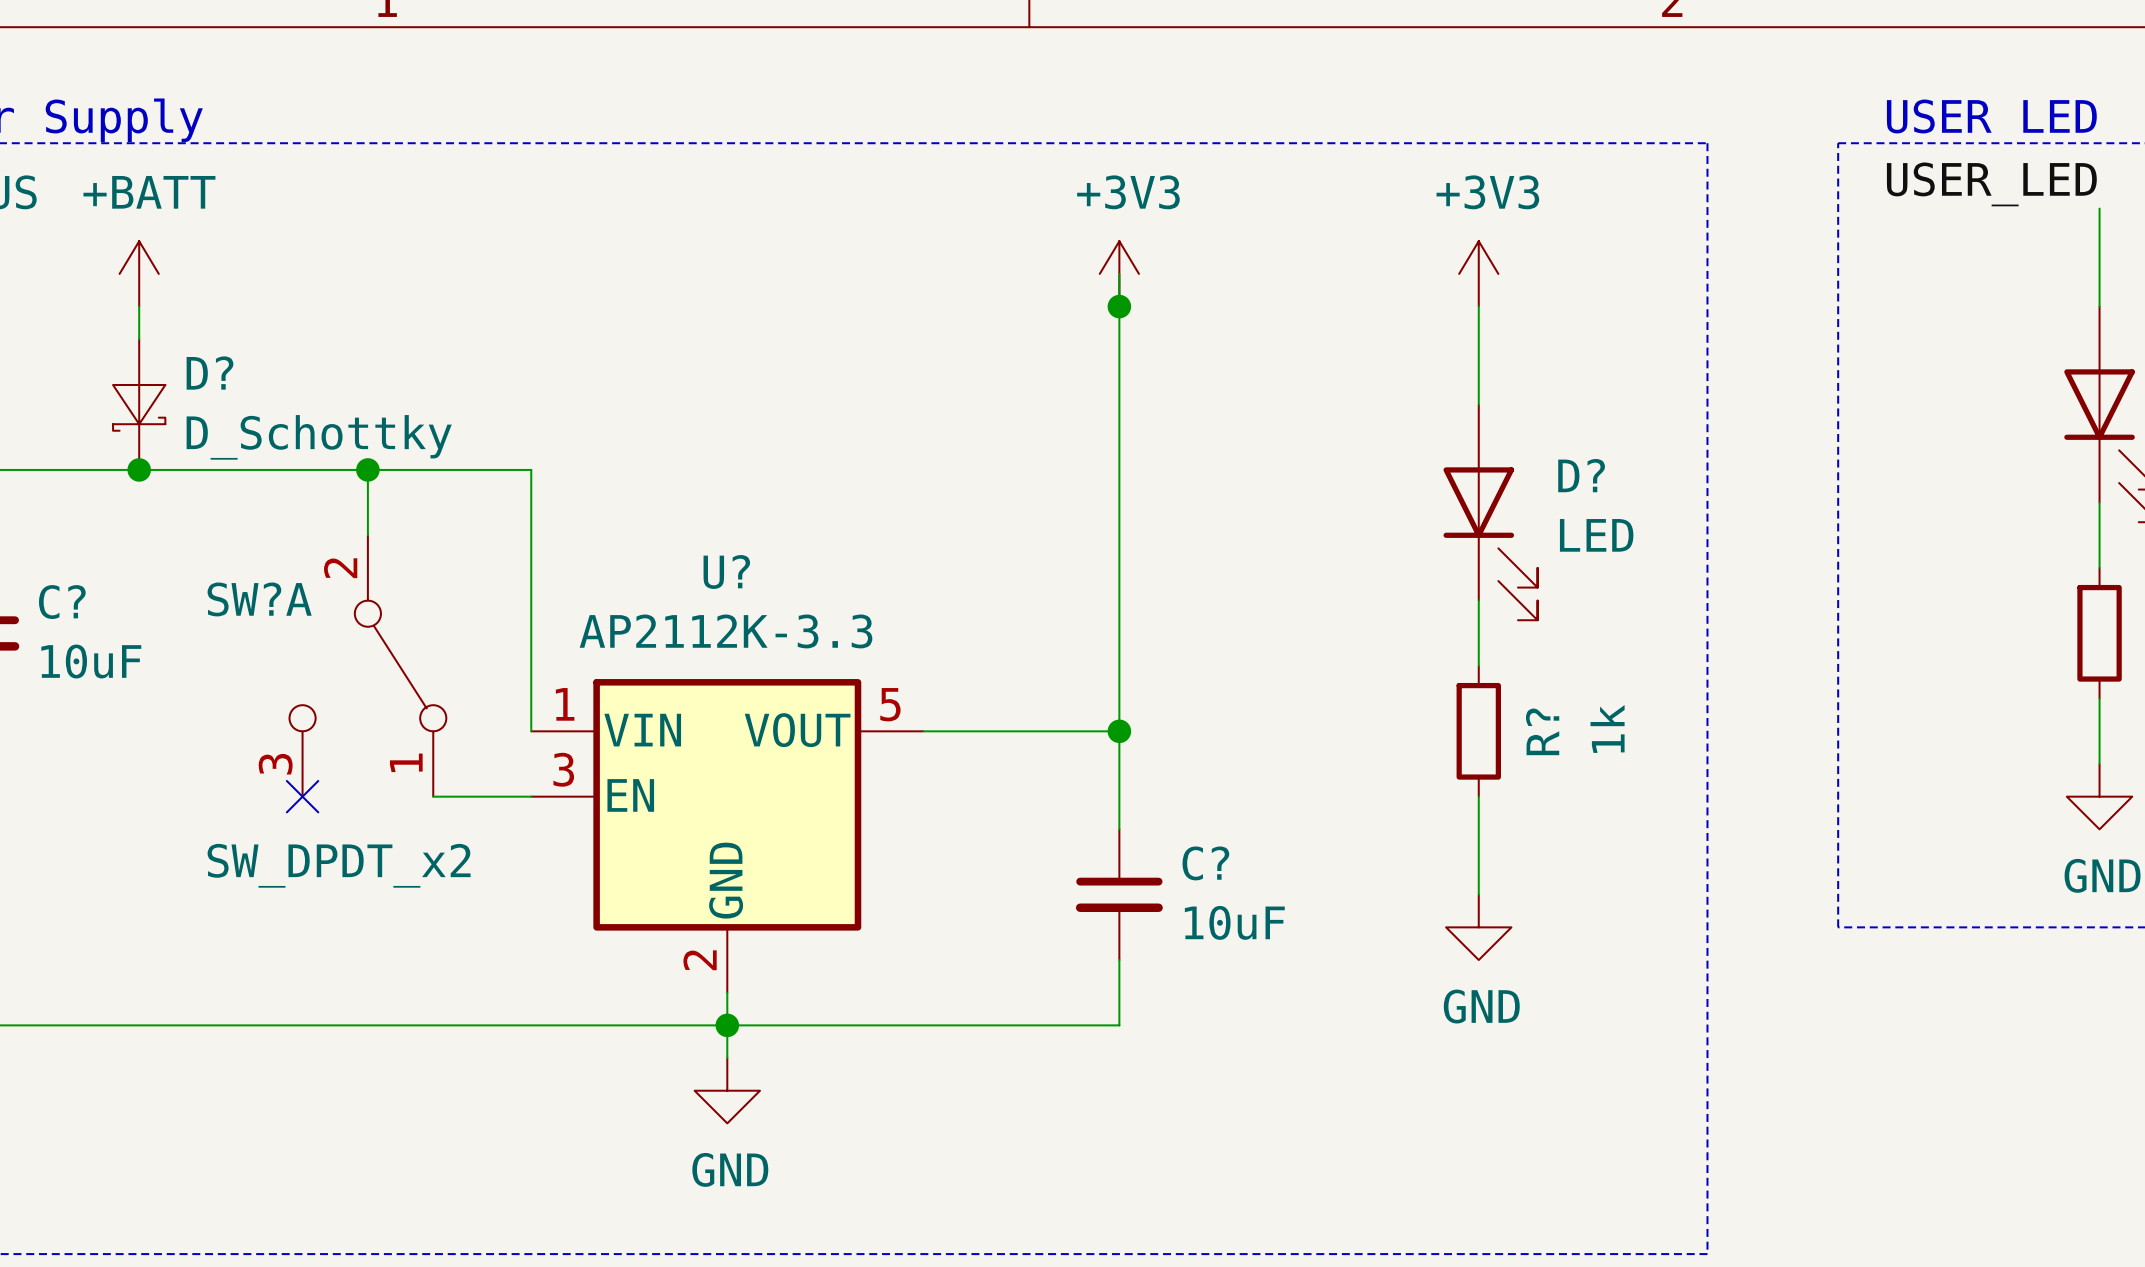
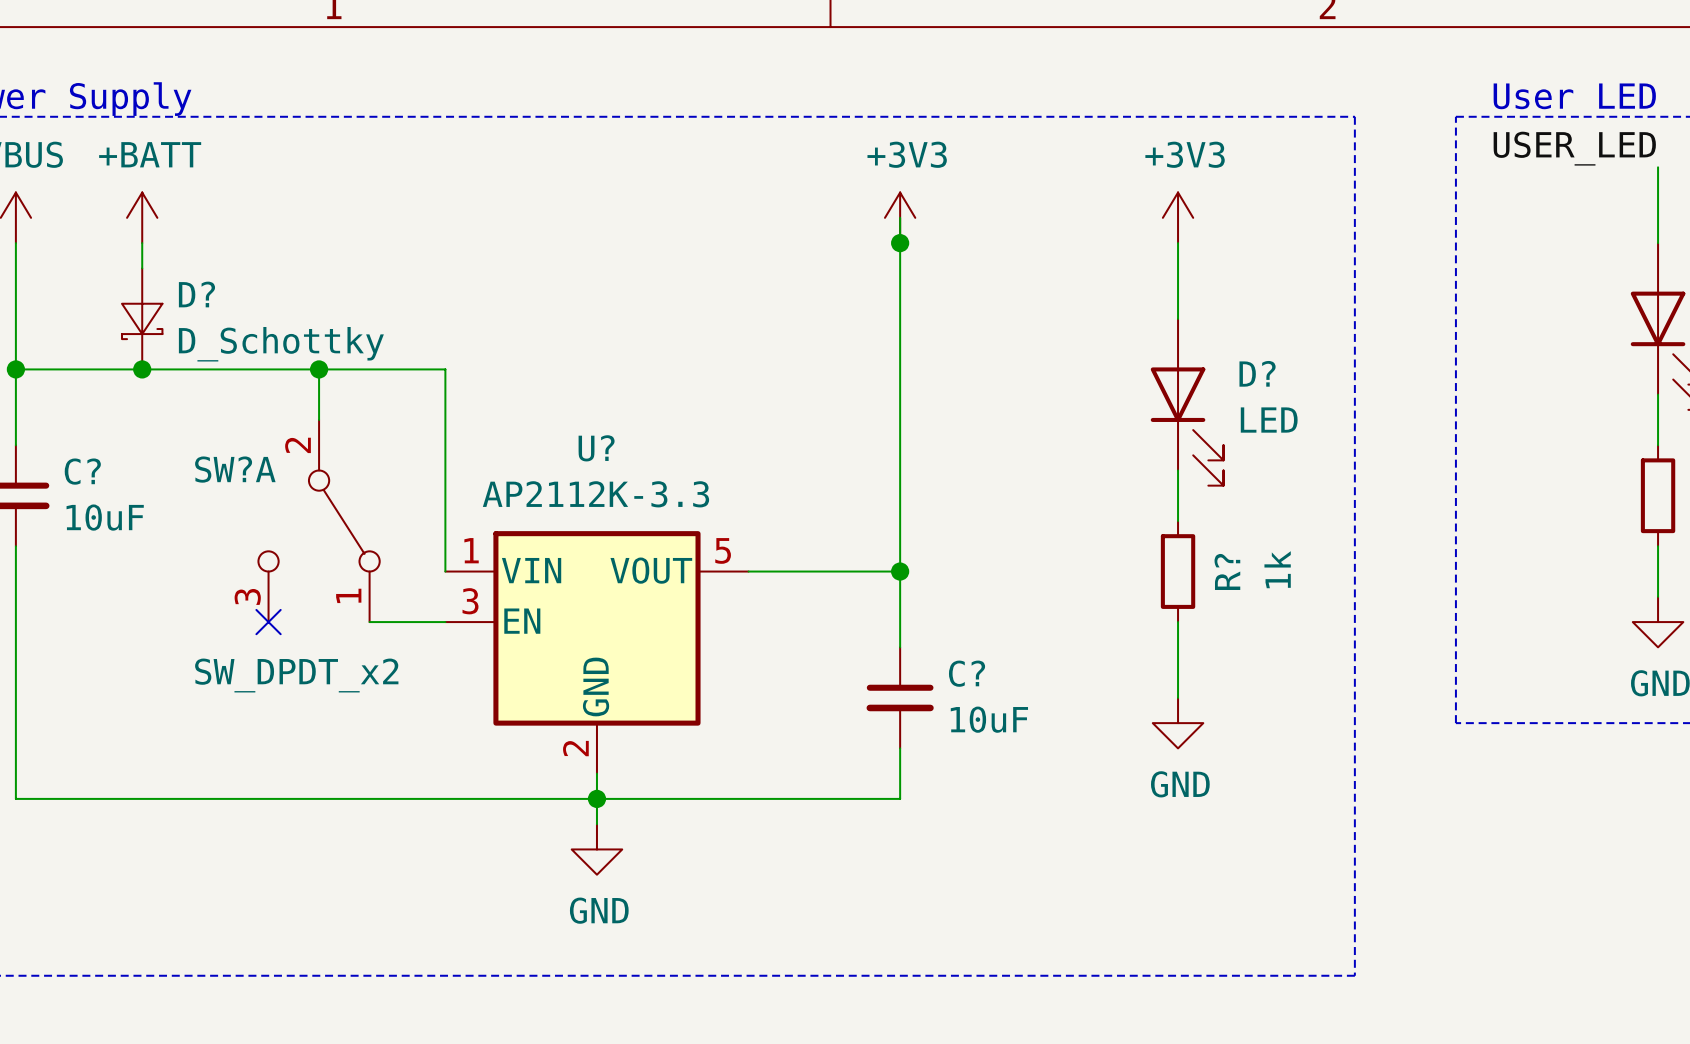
text: USER LED (1991, 116) -> User LED (1574, 96)

